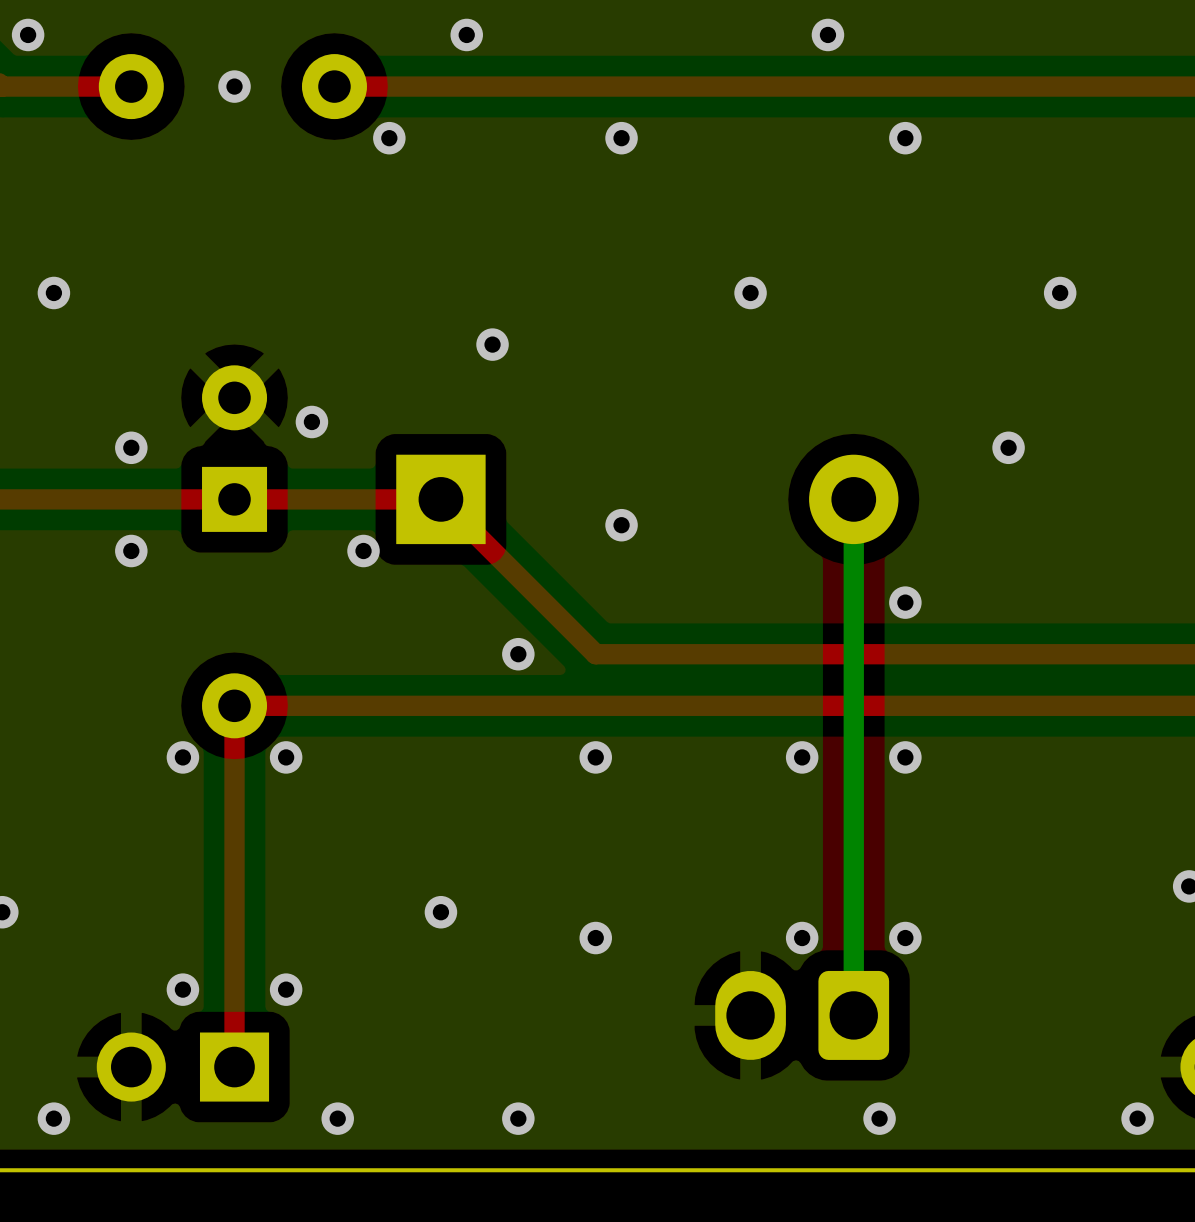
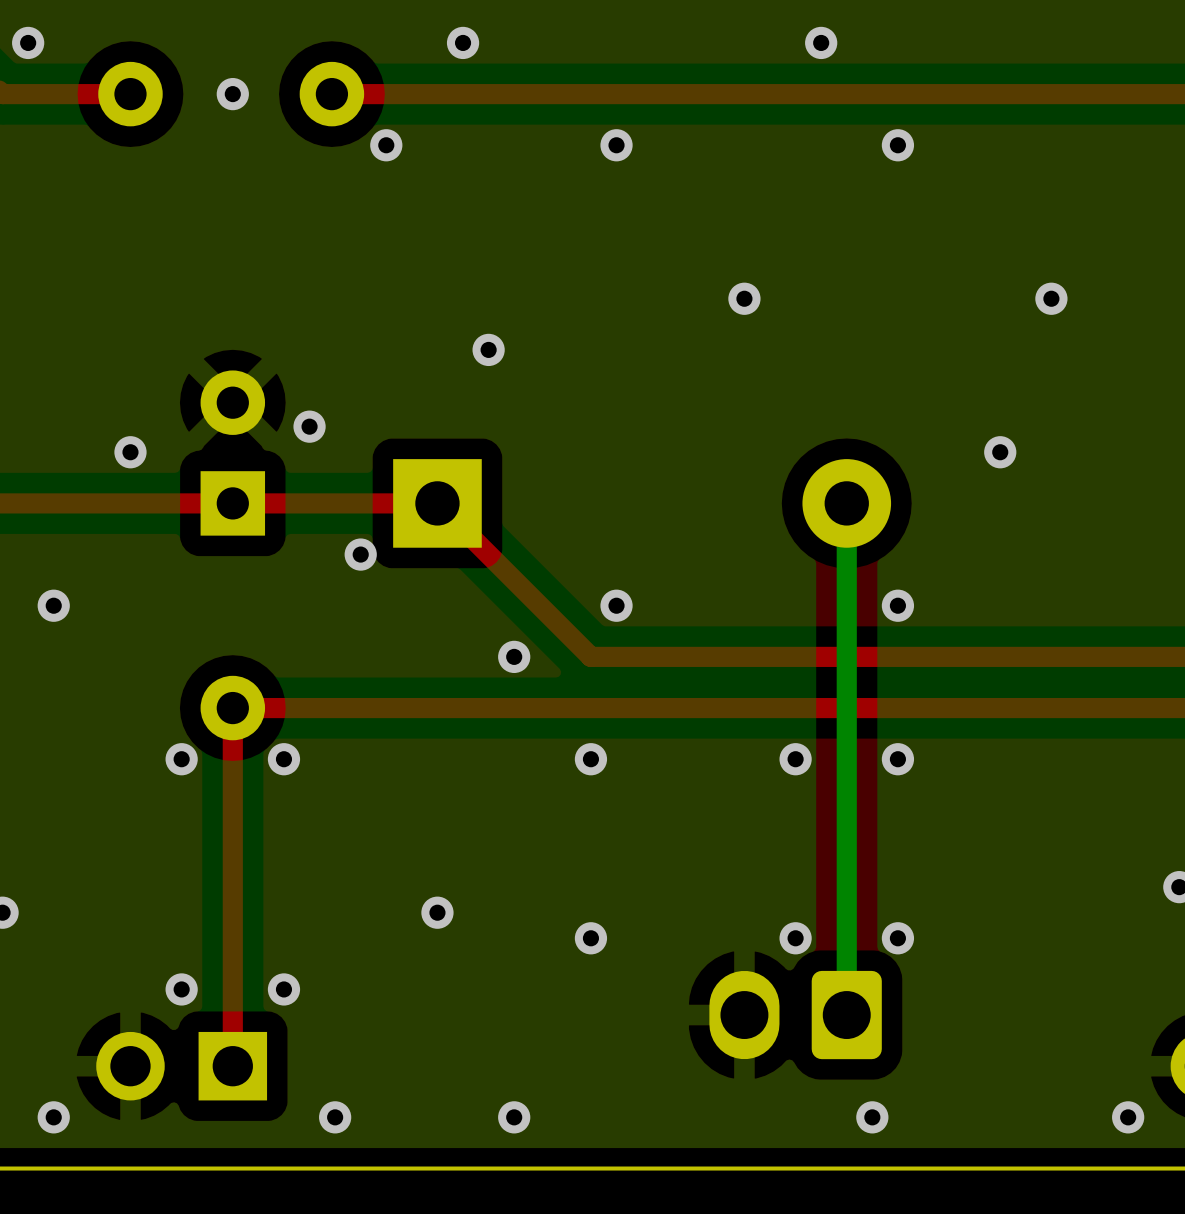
via: (53, 292) -> none
via position: (621, 525) -> (616, 605)
via position: (131, 551) -> (53, 605)

